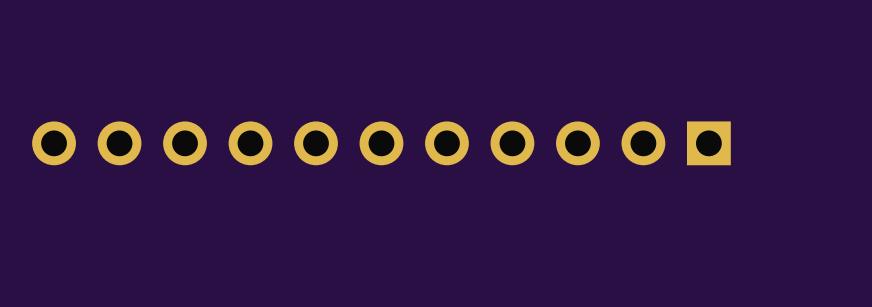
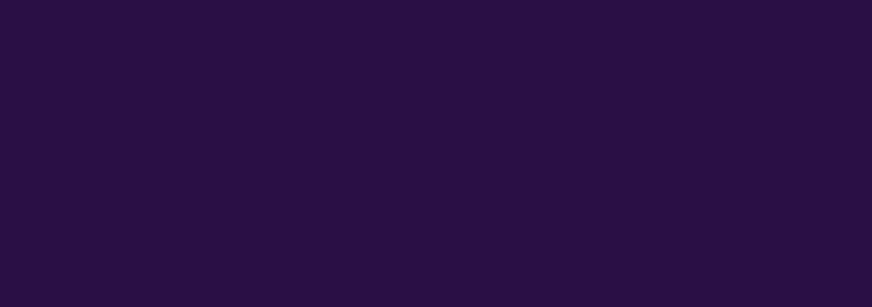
part: (381, 143) -> none

